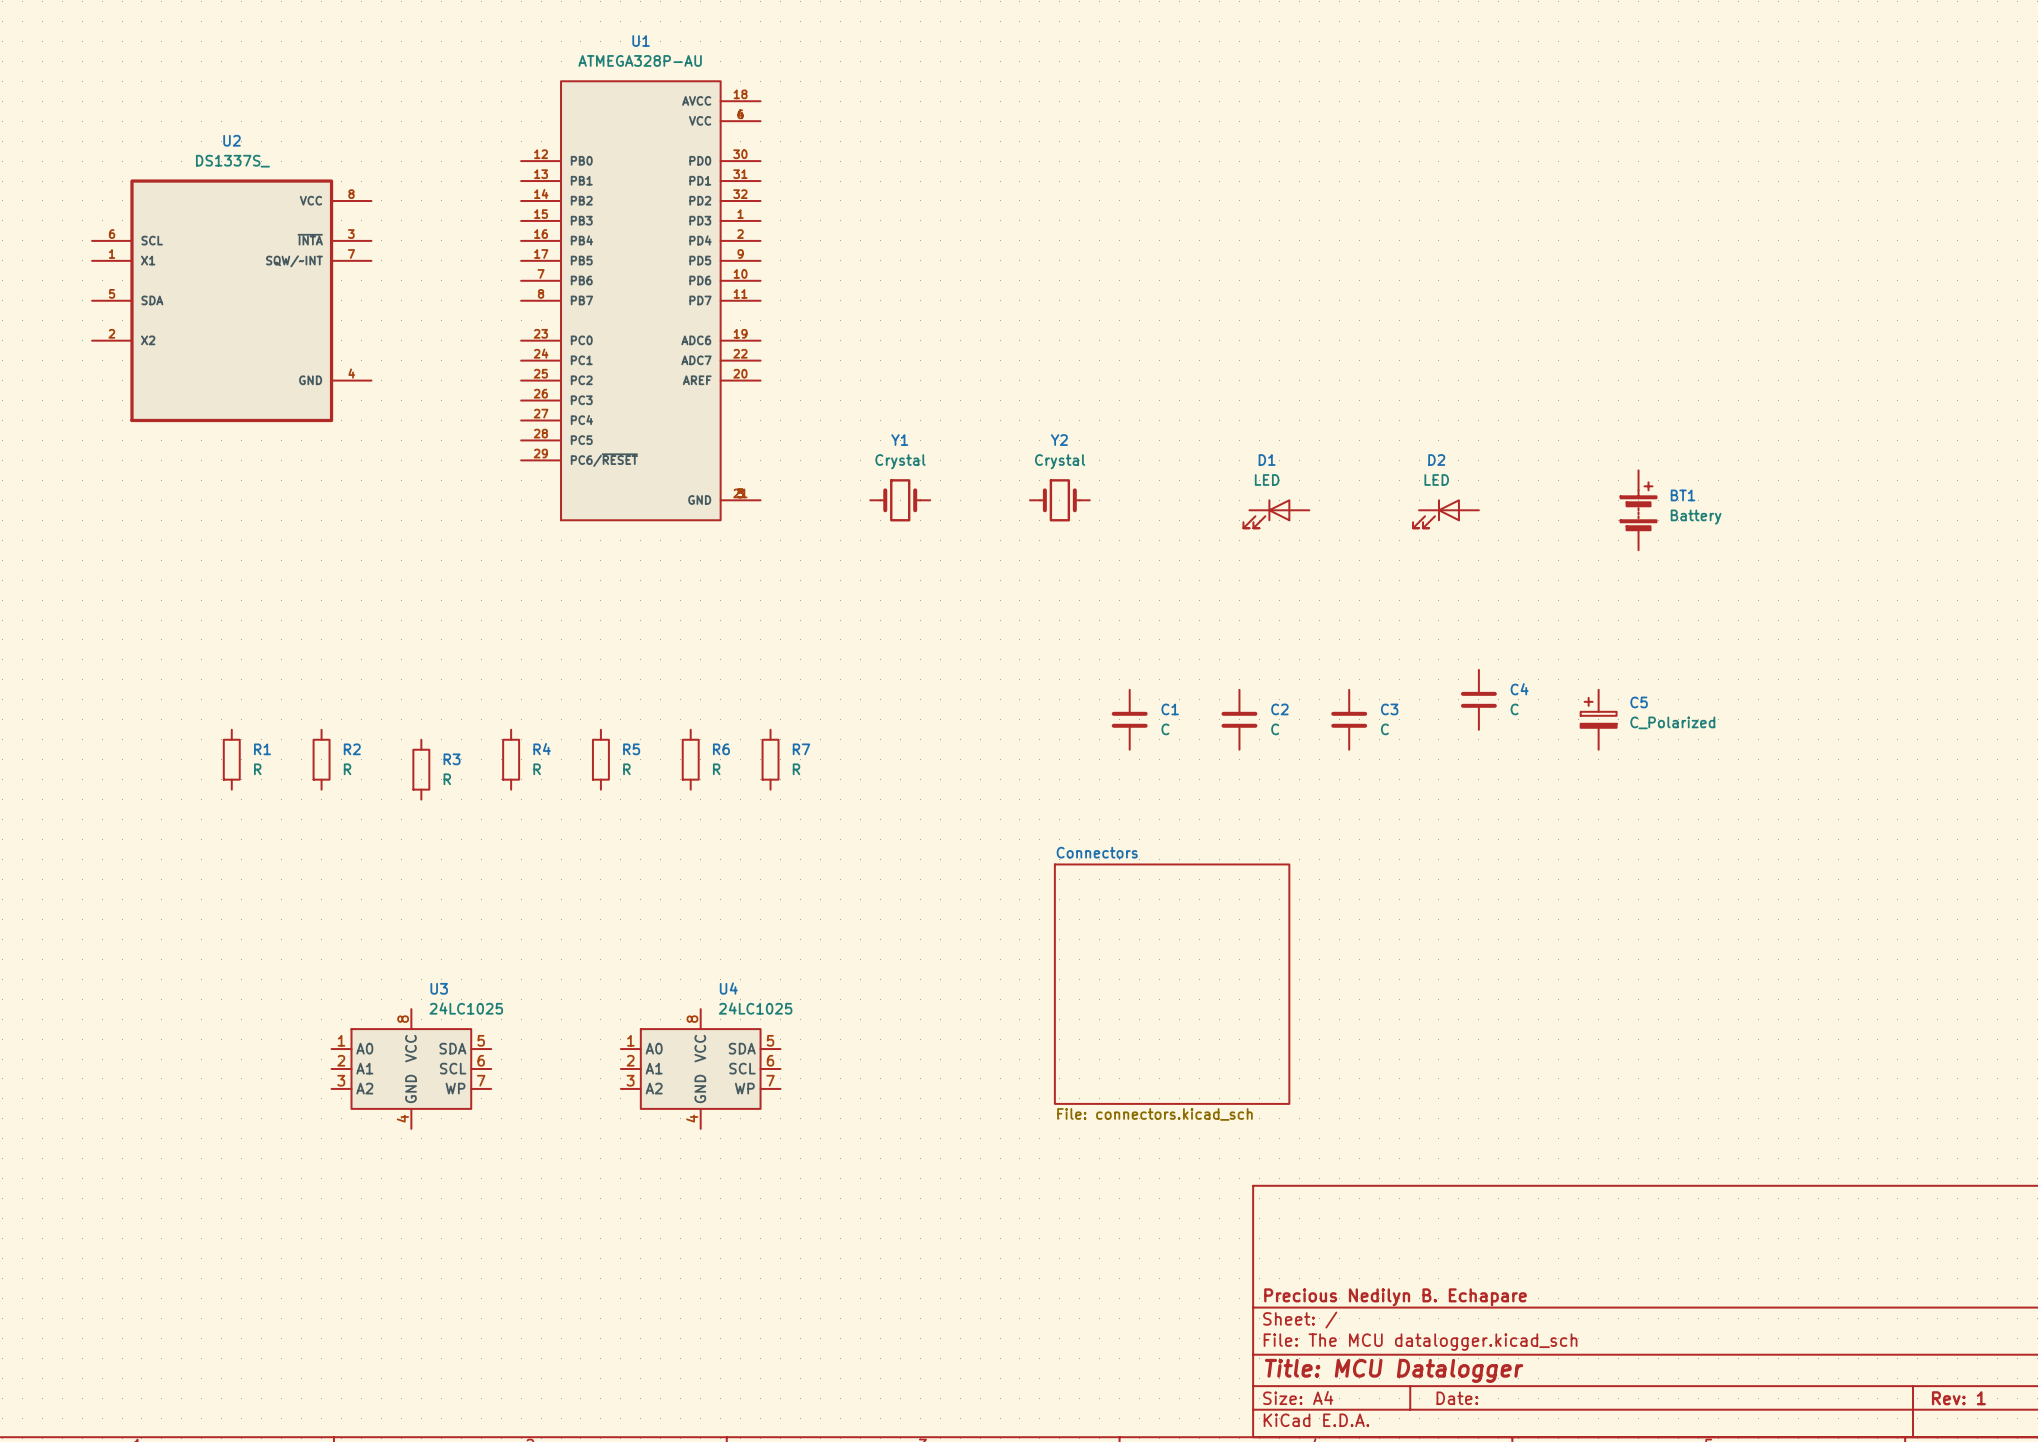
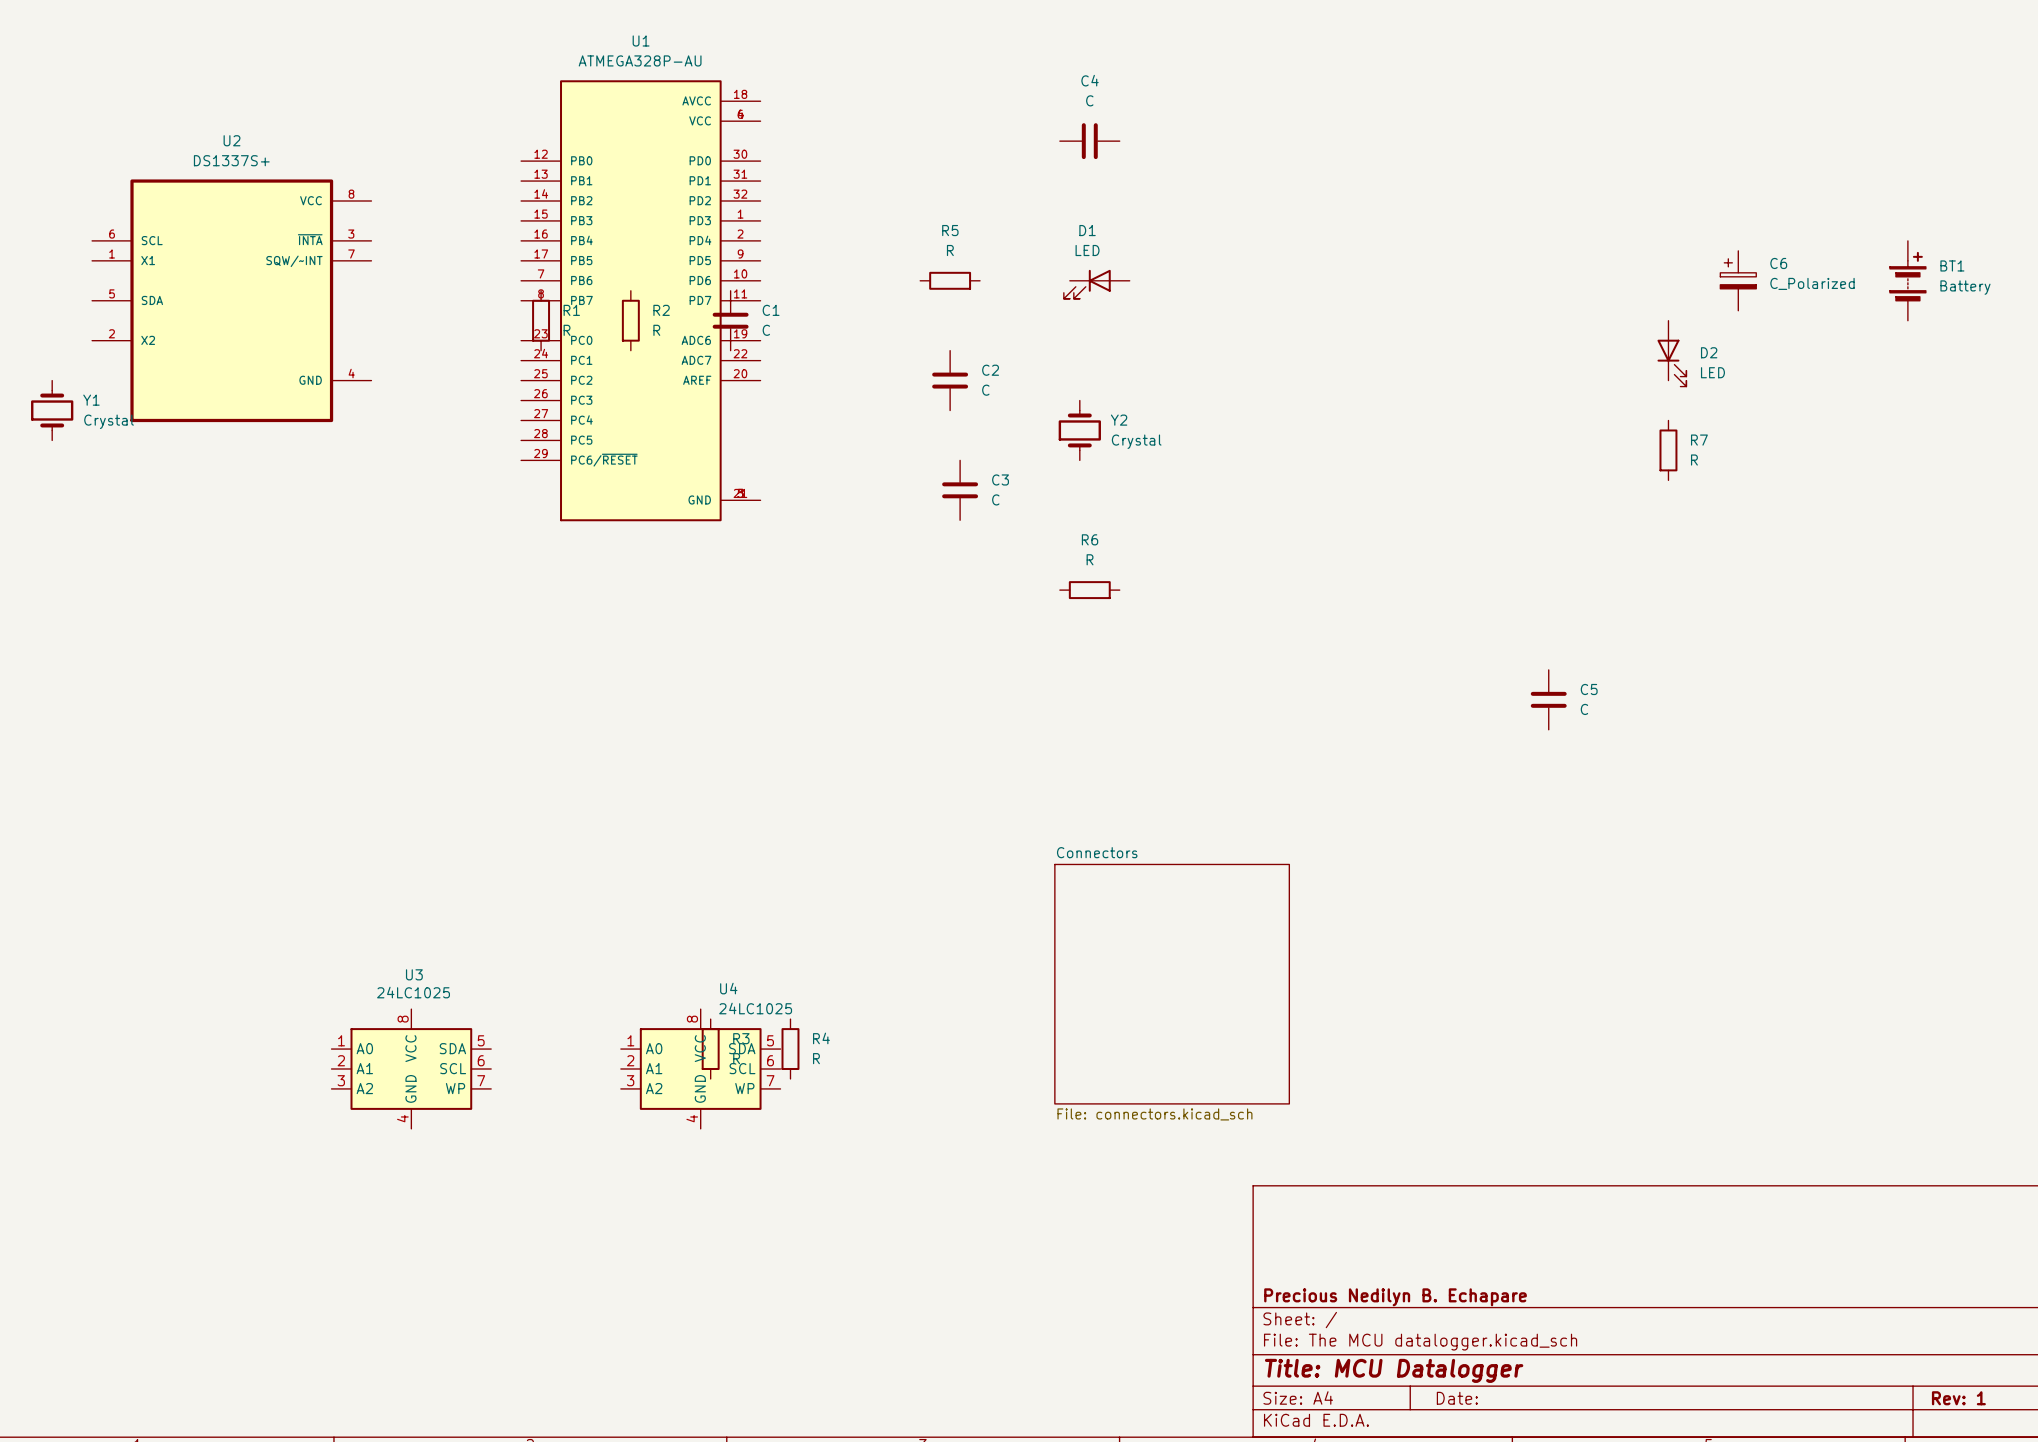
U2 value: DS1337S_ (232, 161) -> DS1337S+ (231, 160)
C6: none -> C_Polarized (1738, 280)
Y1 name position: Y1 (899, 440) -> Y1 (91, 400)
Y2 name position: Y2 (1059, 440) -> Y2 (1119, 420)
D2 name position: D2 (1436, 460) -> D2 (1709, 352)
Y1 value position: Crystal (900, 461) -> Crystal (109, 421)
Y2 value position: Crystal (1060, 461) -> Crystal (1136, 441)
D2 value position: LED (1436, 479) -> LED (1712, 372)
Y1 rotation: 0° (900, 500) -> 90° clockwise (52, 410)
Y1 position: (900, 500) -> (52, 410)
Y2 rotation: 0° (1059, 500) -> 90° clockwise (1079, 430)
Y2 position: (1059, 500) -> (1079, 430)
BT1 position: (1638, 510) -> (1907, 280)
D1 position: (1276, 513) -> (1096, 284)
D2 rotation: 0° (1436, 513) -> 90° counterclockwise (1671, 363)
D2 position: (1445, 513) -> (1671, 353)
C4 name position: C4 (1519, 689) -> C4 (1090, 80)
C5 symbol: [1580, 689, 1617, 750] -> [1530, 669, 1567, 730]
C4 rotation: 0° (1478, 699) -> 90° clockwise (1089, 141)
C4 position: (1478, 699) -> (1089, 141)
C4 value position: C (1514, 709) -> C (1089, 100)
C1 position: (1129, 719) -> (730, 320)
C2 position: (1239, 719) -> (950, 380)
C3 position: (1349, 719) -> (960, 490)
C5 value: C_Polarized (1672, 722) -> C (1584, 709)
R5 name position: R5 (631, 749) -> R5 (950, 230)
R6 name position: R6 (721, 749) -> R6 (1090, 539)
R1 position: (231, 759) -> (541, 320)
R2 position: (321, 759) -> (630, 320)
R4 position: (511, 759) -> (790, 1049)
R5 rotation: 0° (600, 759) -> 90° clockwise (950, 280)
R5 position: (600, 759) -> (950, 280)
R6 rotation: 0° (690, 759) -> 90° clockwise (1089, 590)
R6 position: (690, 759) -> (1089, 590)
R7 position: (770, 759) -> (1668, 450)
R3 position: (421, 769) -> (710, 1049)
R5 value position: R (626, 769) -> R (950, 250)
R6 value position: R (716, 769) -> R (1090, 559)
U3 name position: U3 (439, 988) -> U3 (414, 974)
U3 value position: 24LC1025 (466, 1008) -> 24LC1025 (413, 992)

